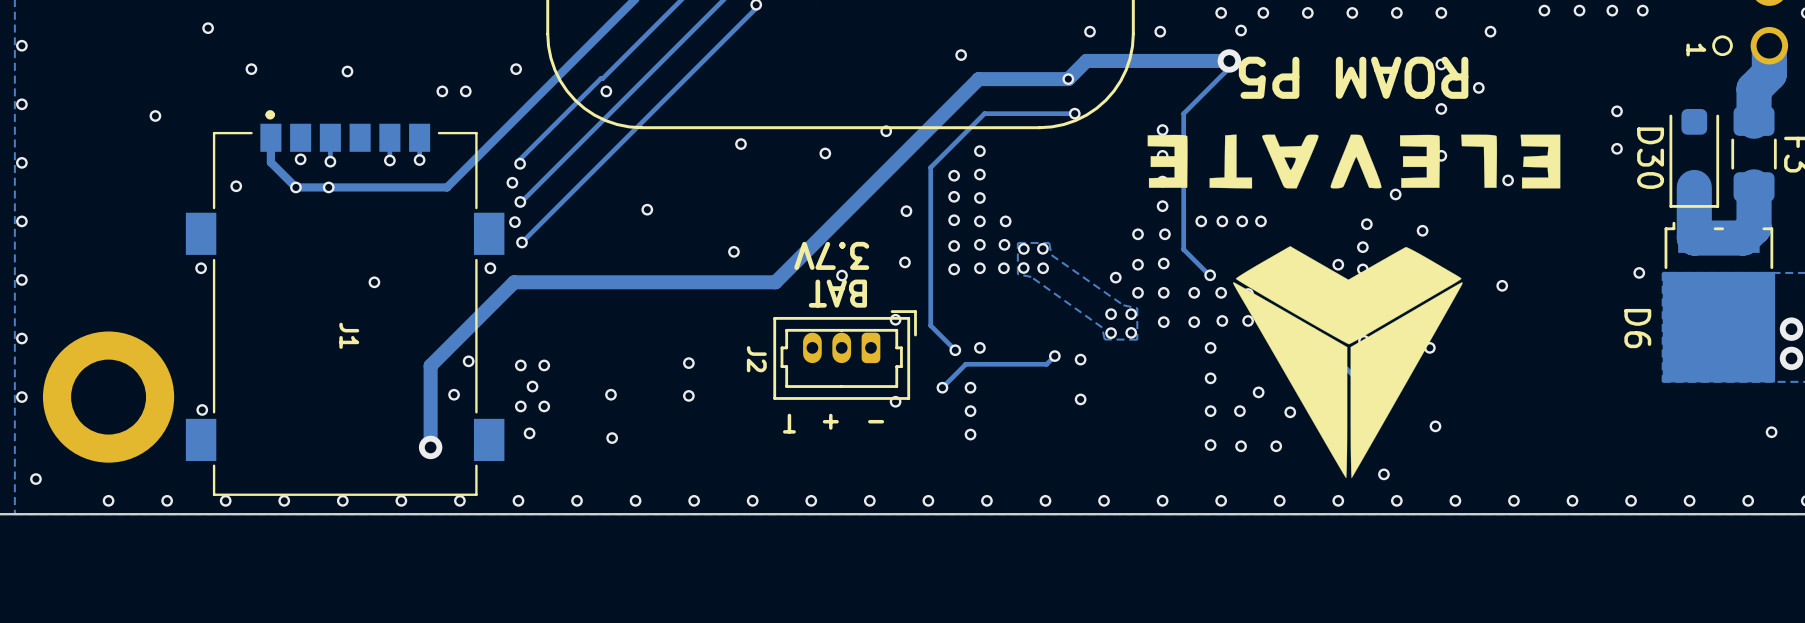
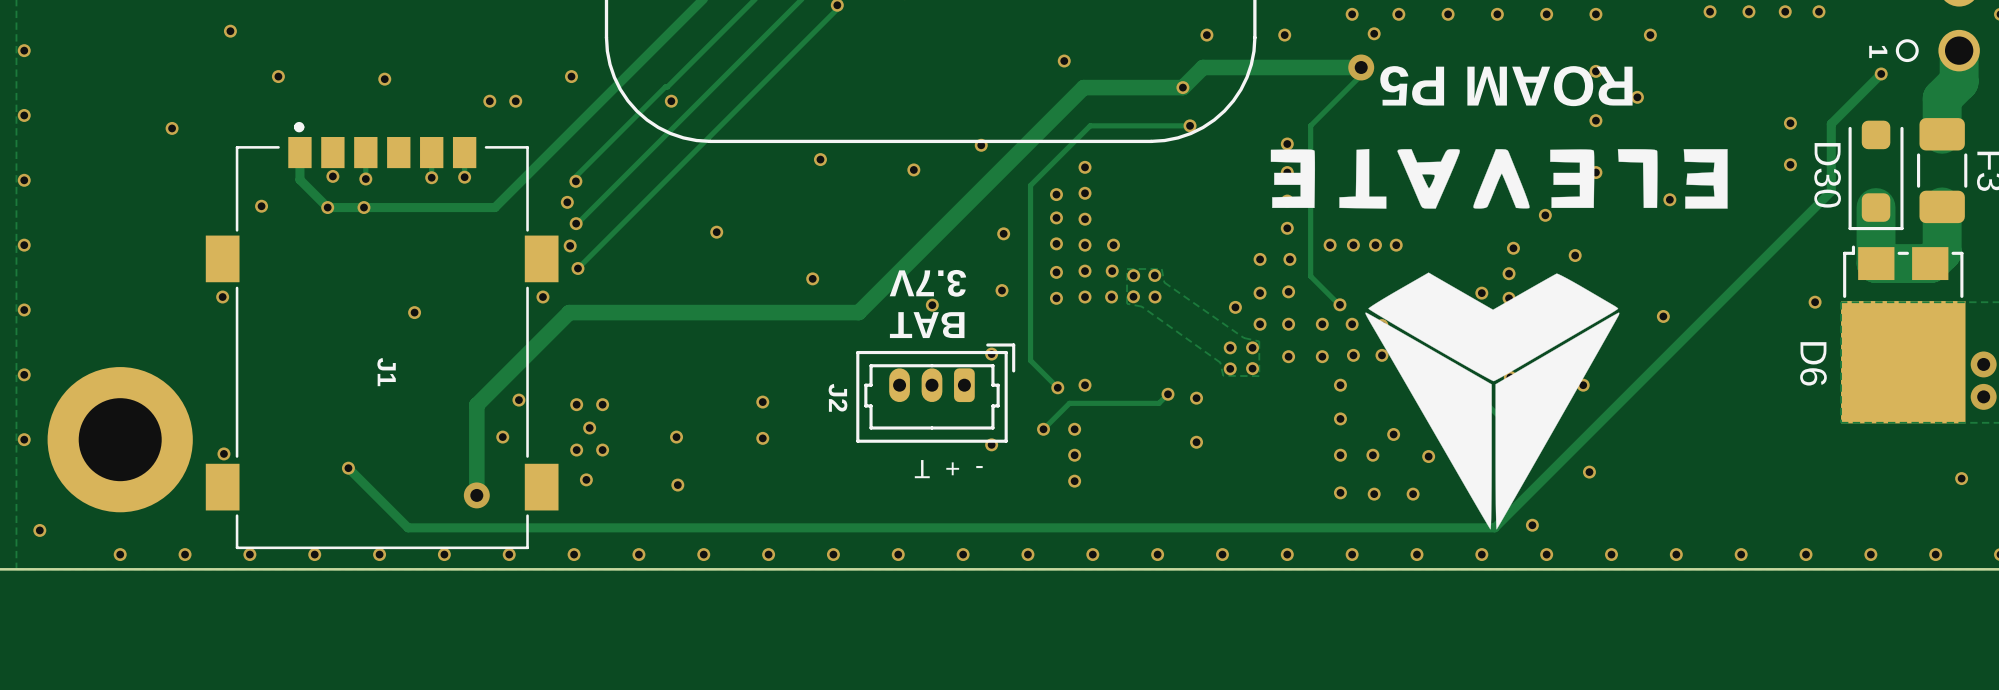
track: none -> (1881, 73) (1831, 123) (1831, 191) (1494, 527) (408, 527) (348, 468)
via: none -> (1881, 73)
via: none -> (348, 468)

